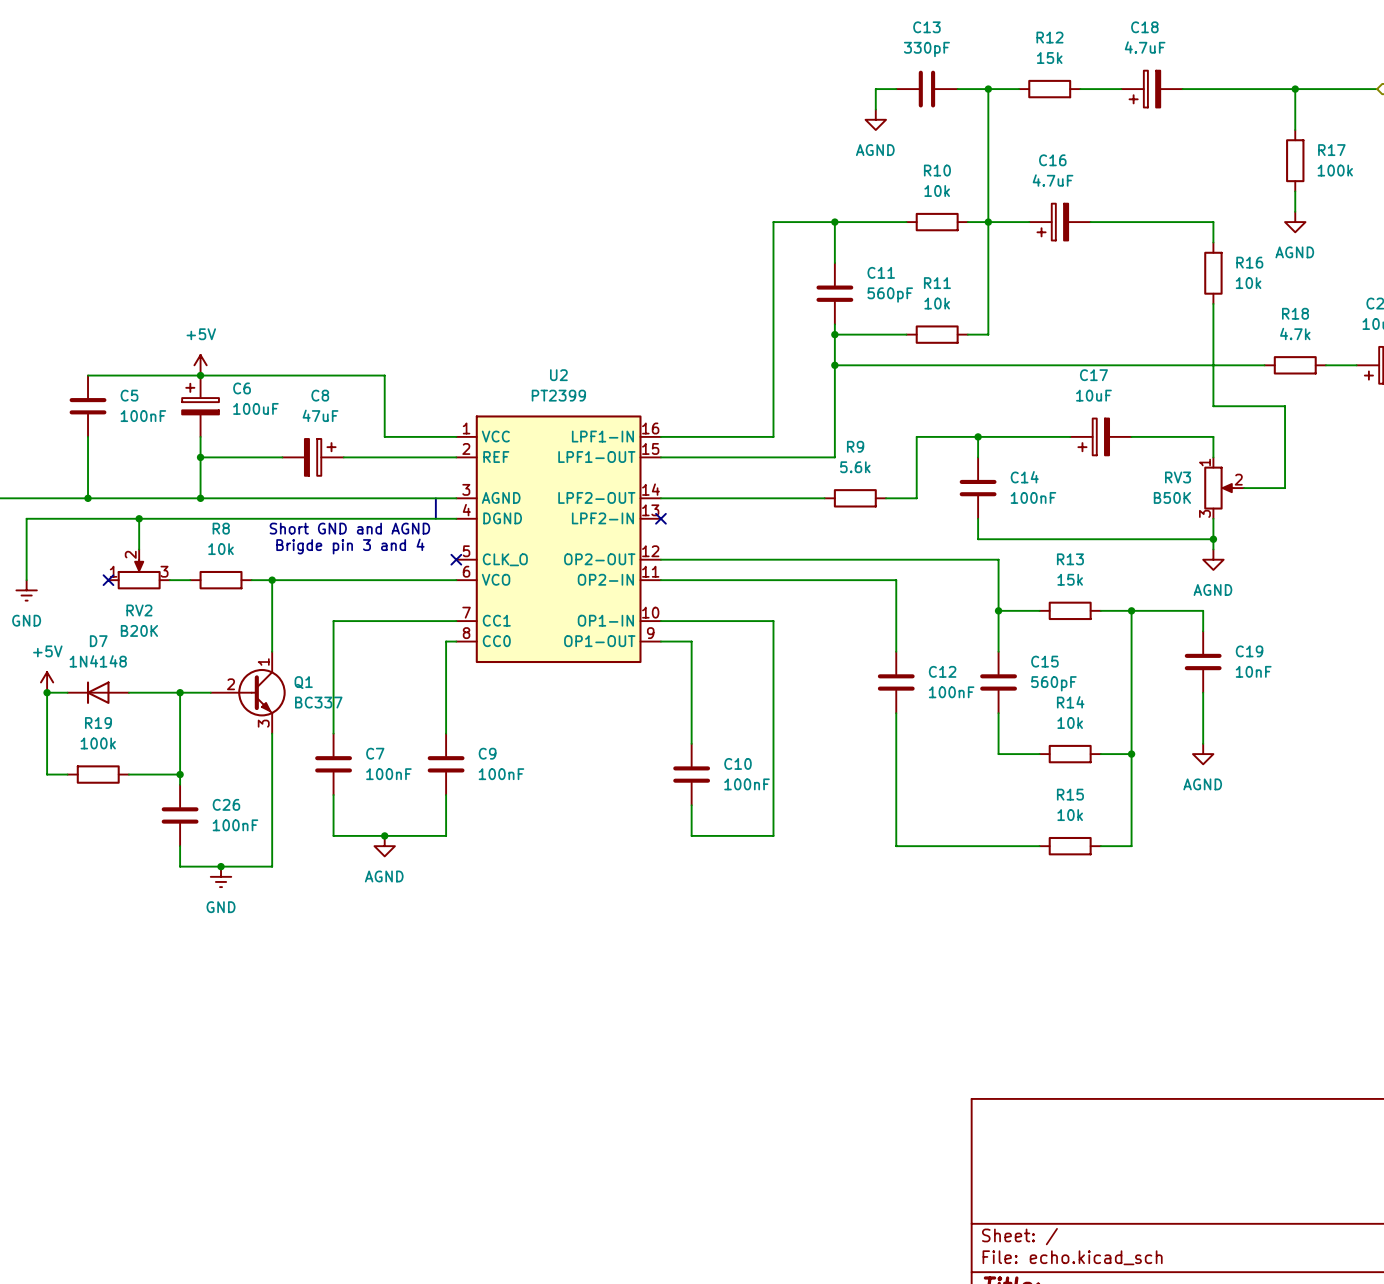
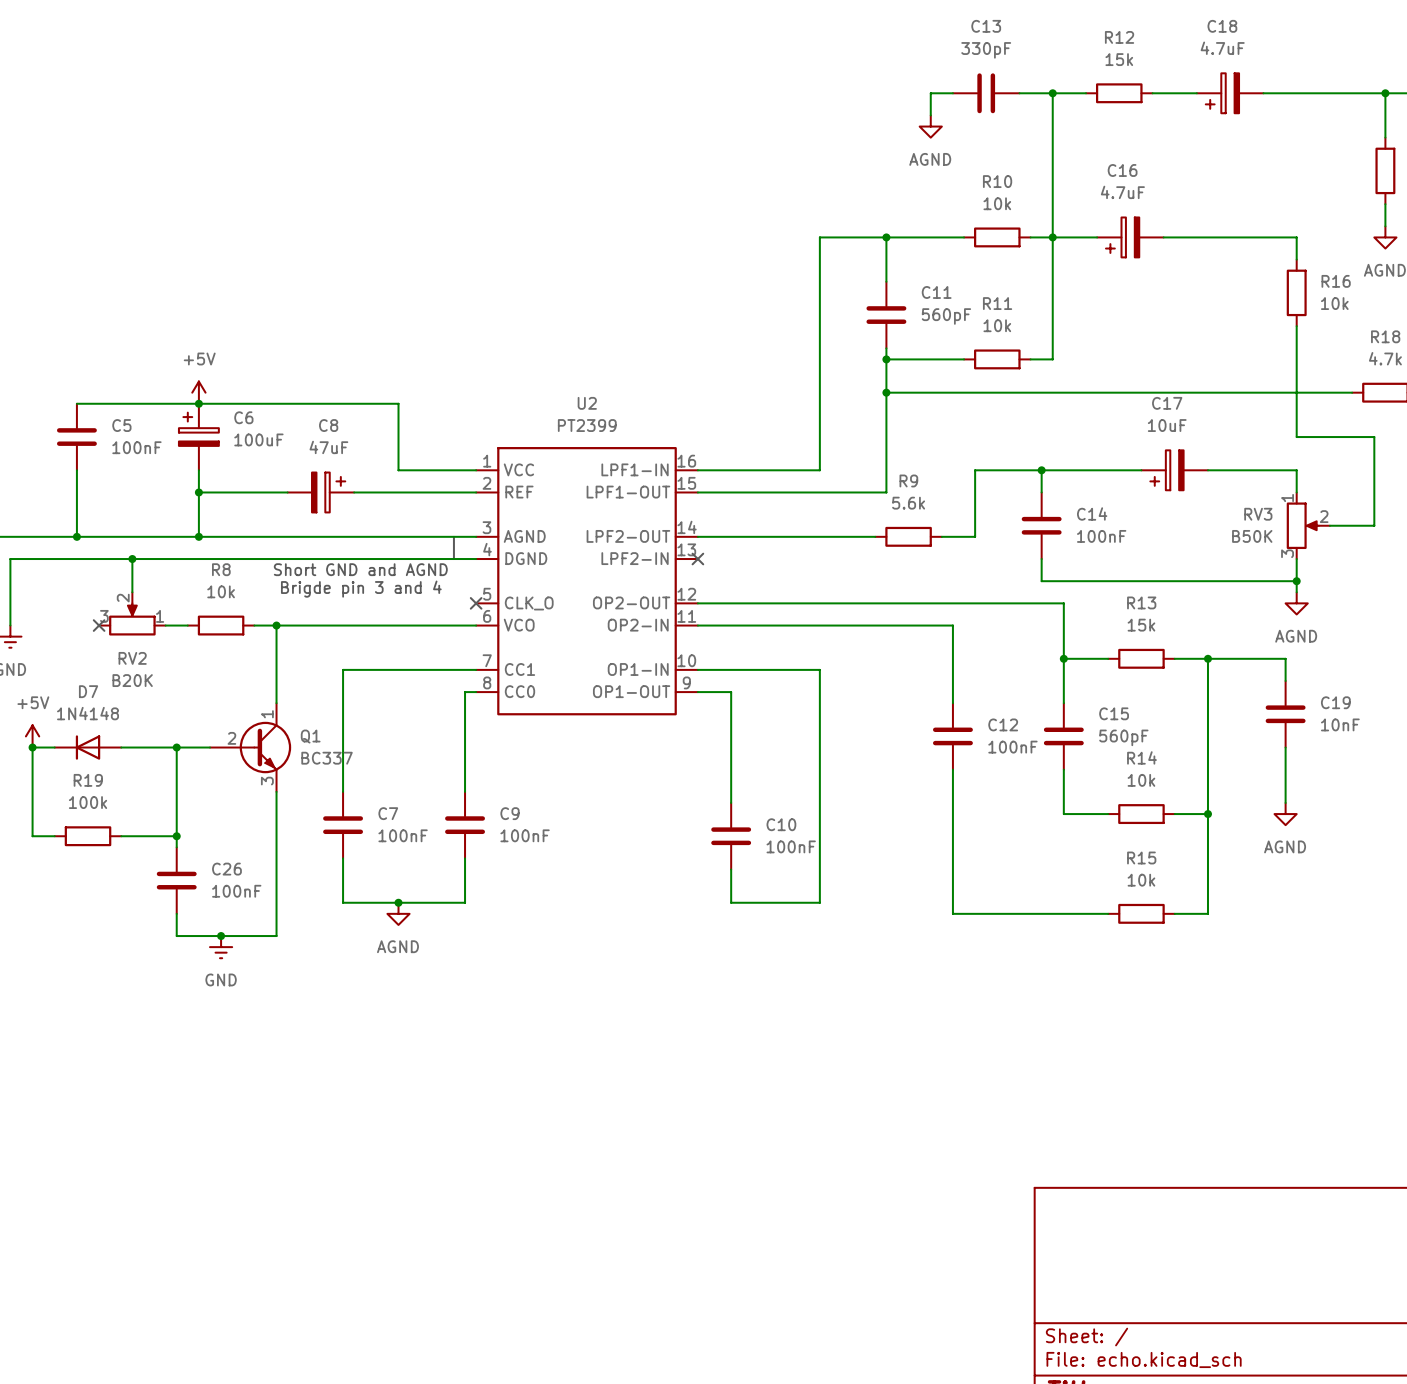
RV2 flip: as is (139, 574) -> left-right (132, 619)

